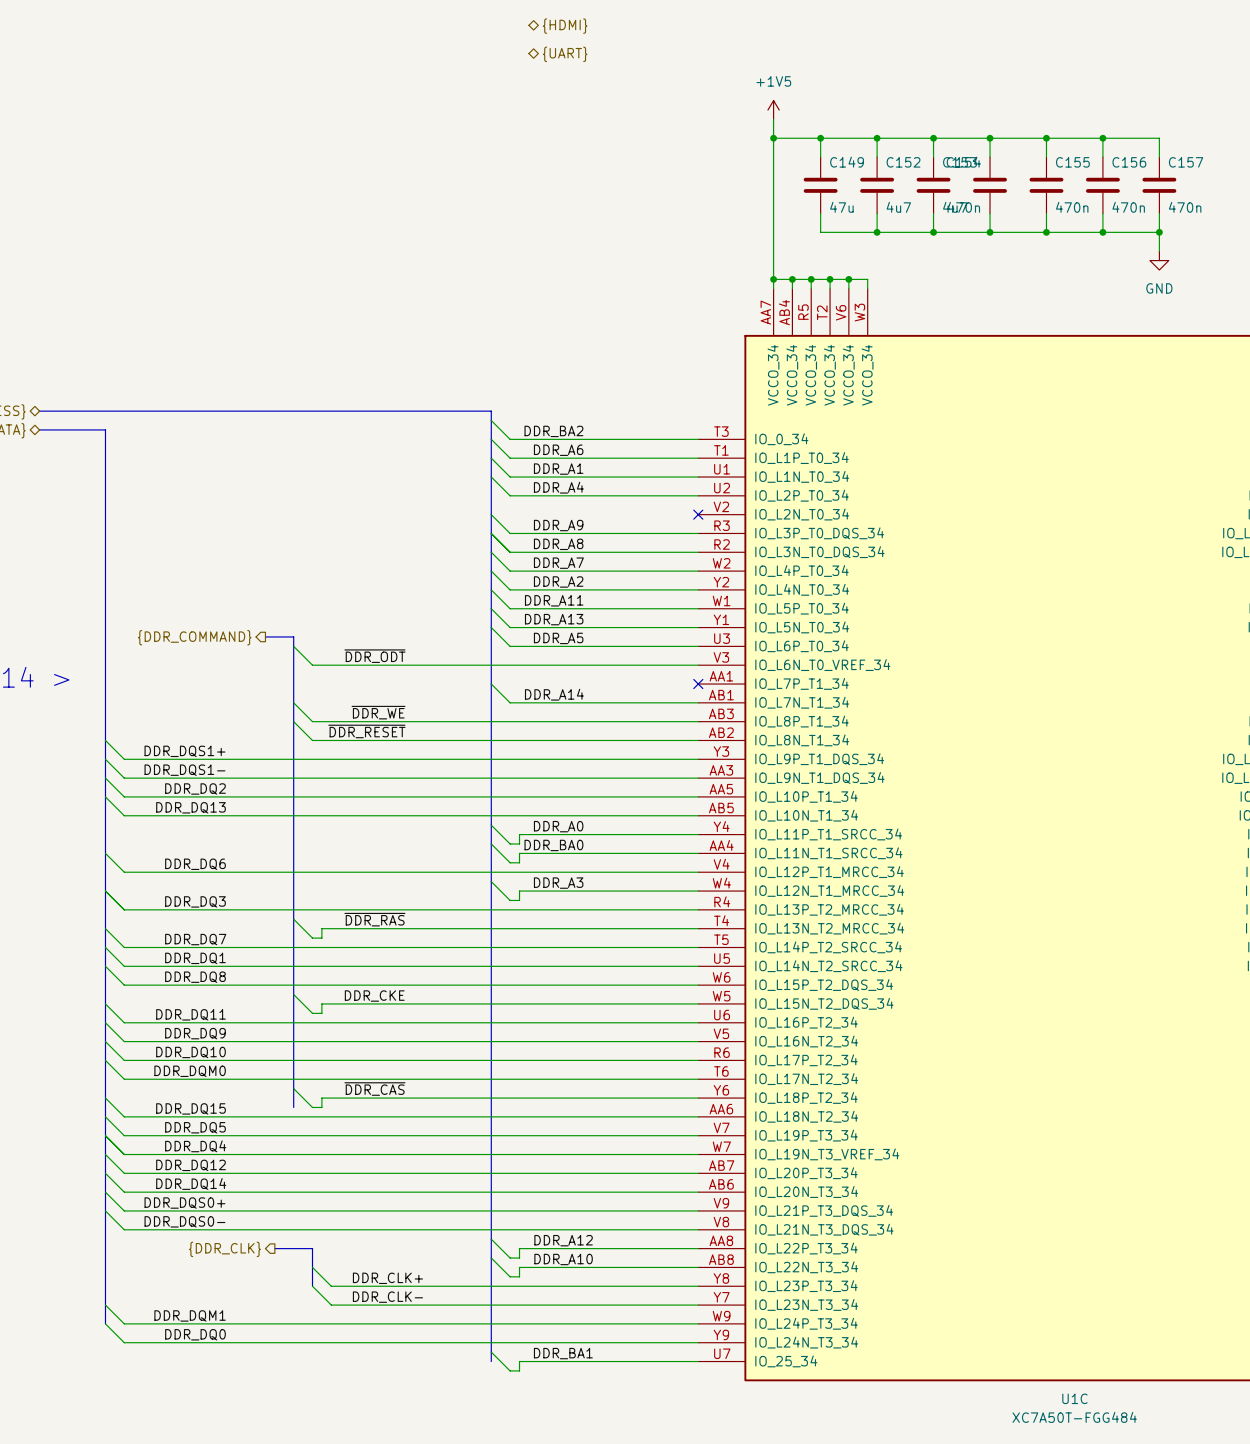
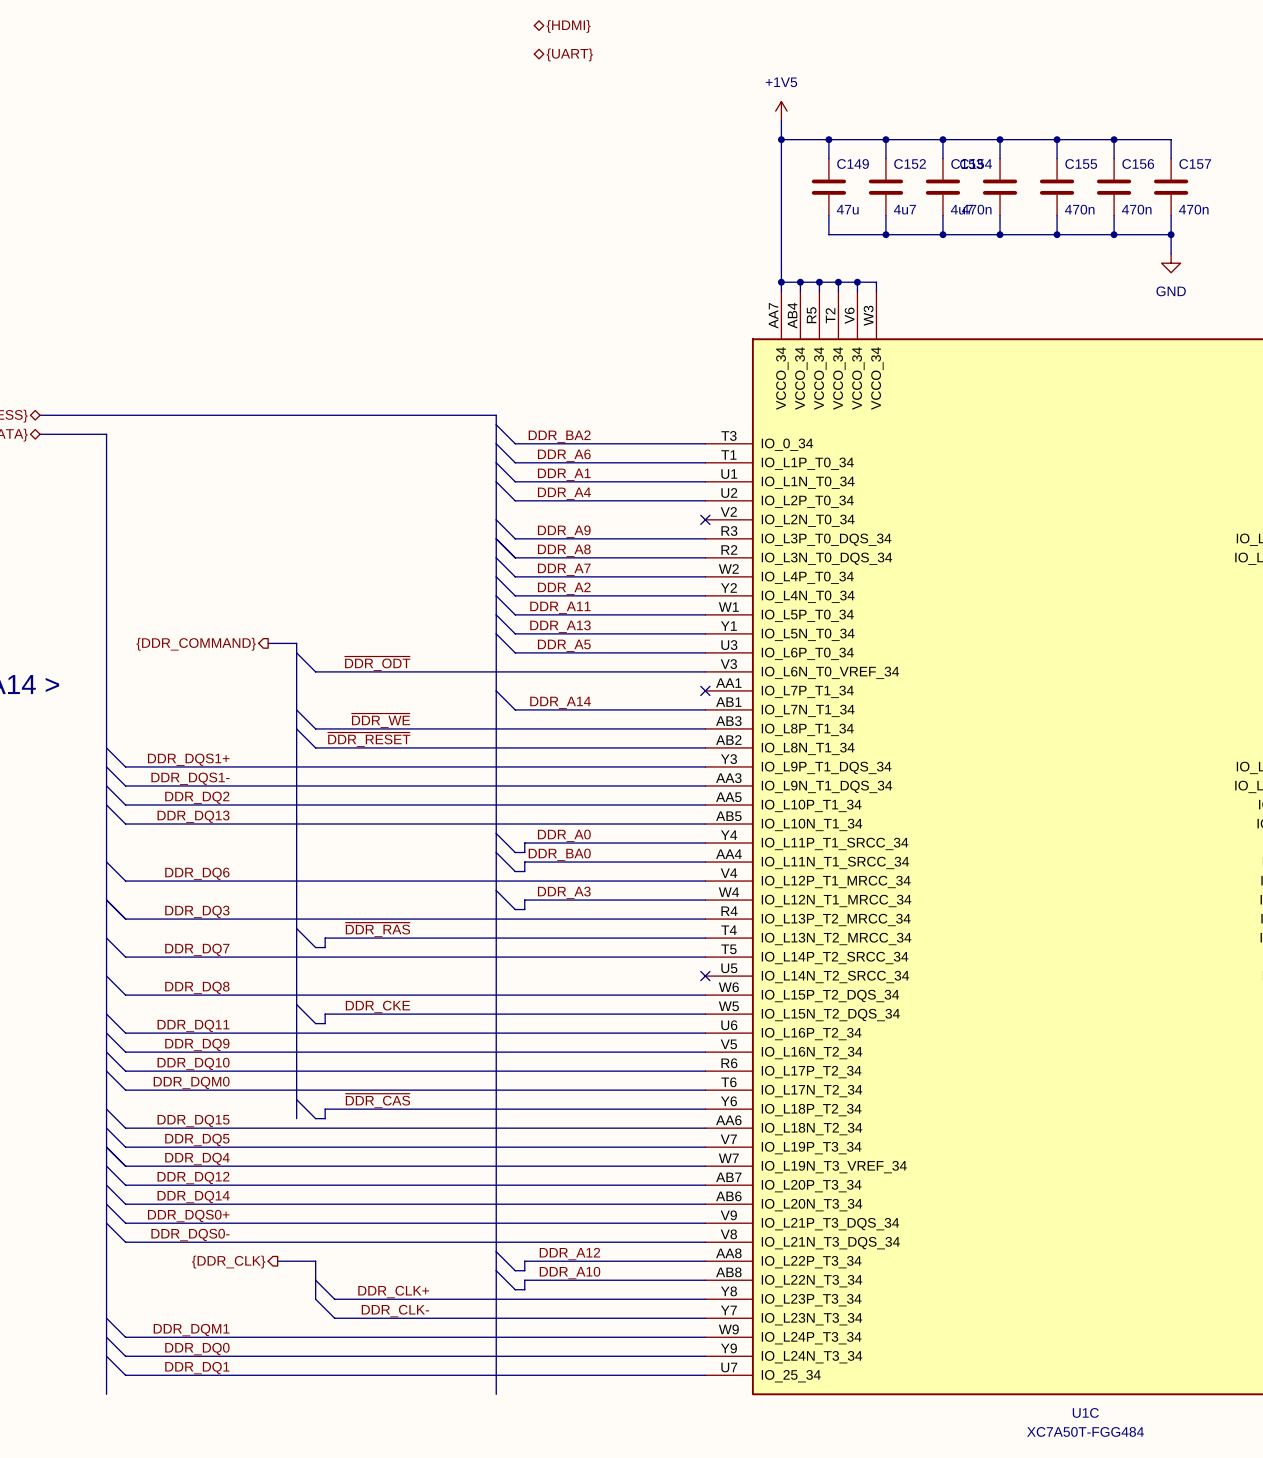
wire: (105, 947) (124, 966) (698, 966) -> none
label: DDR_DQ1 (195, 958) -> none
no-connect mark: none -> (705, 976)
bus: none -> (106, 1337) (106, 1394)
wire: (491, 1352) (510, 1370) (519, 1370) (519, 1361) -> (106, 1356) (125, 1375) (524, 1375)
label: none -> DDR_DQ1 (197, 1368)
label: DDR_BA1 (563, 1353) -> none
bus: none -> (496, 1375) (496, 1394)

